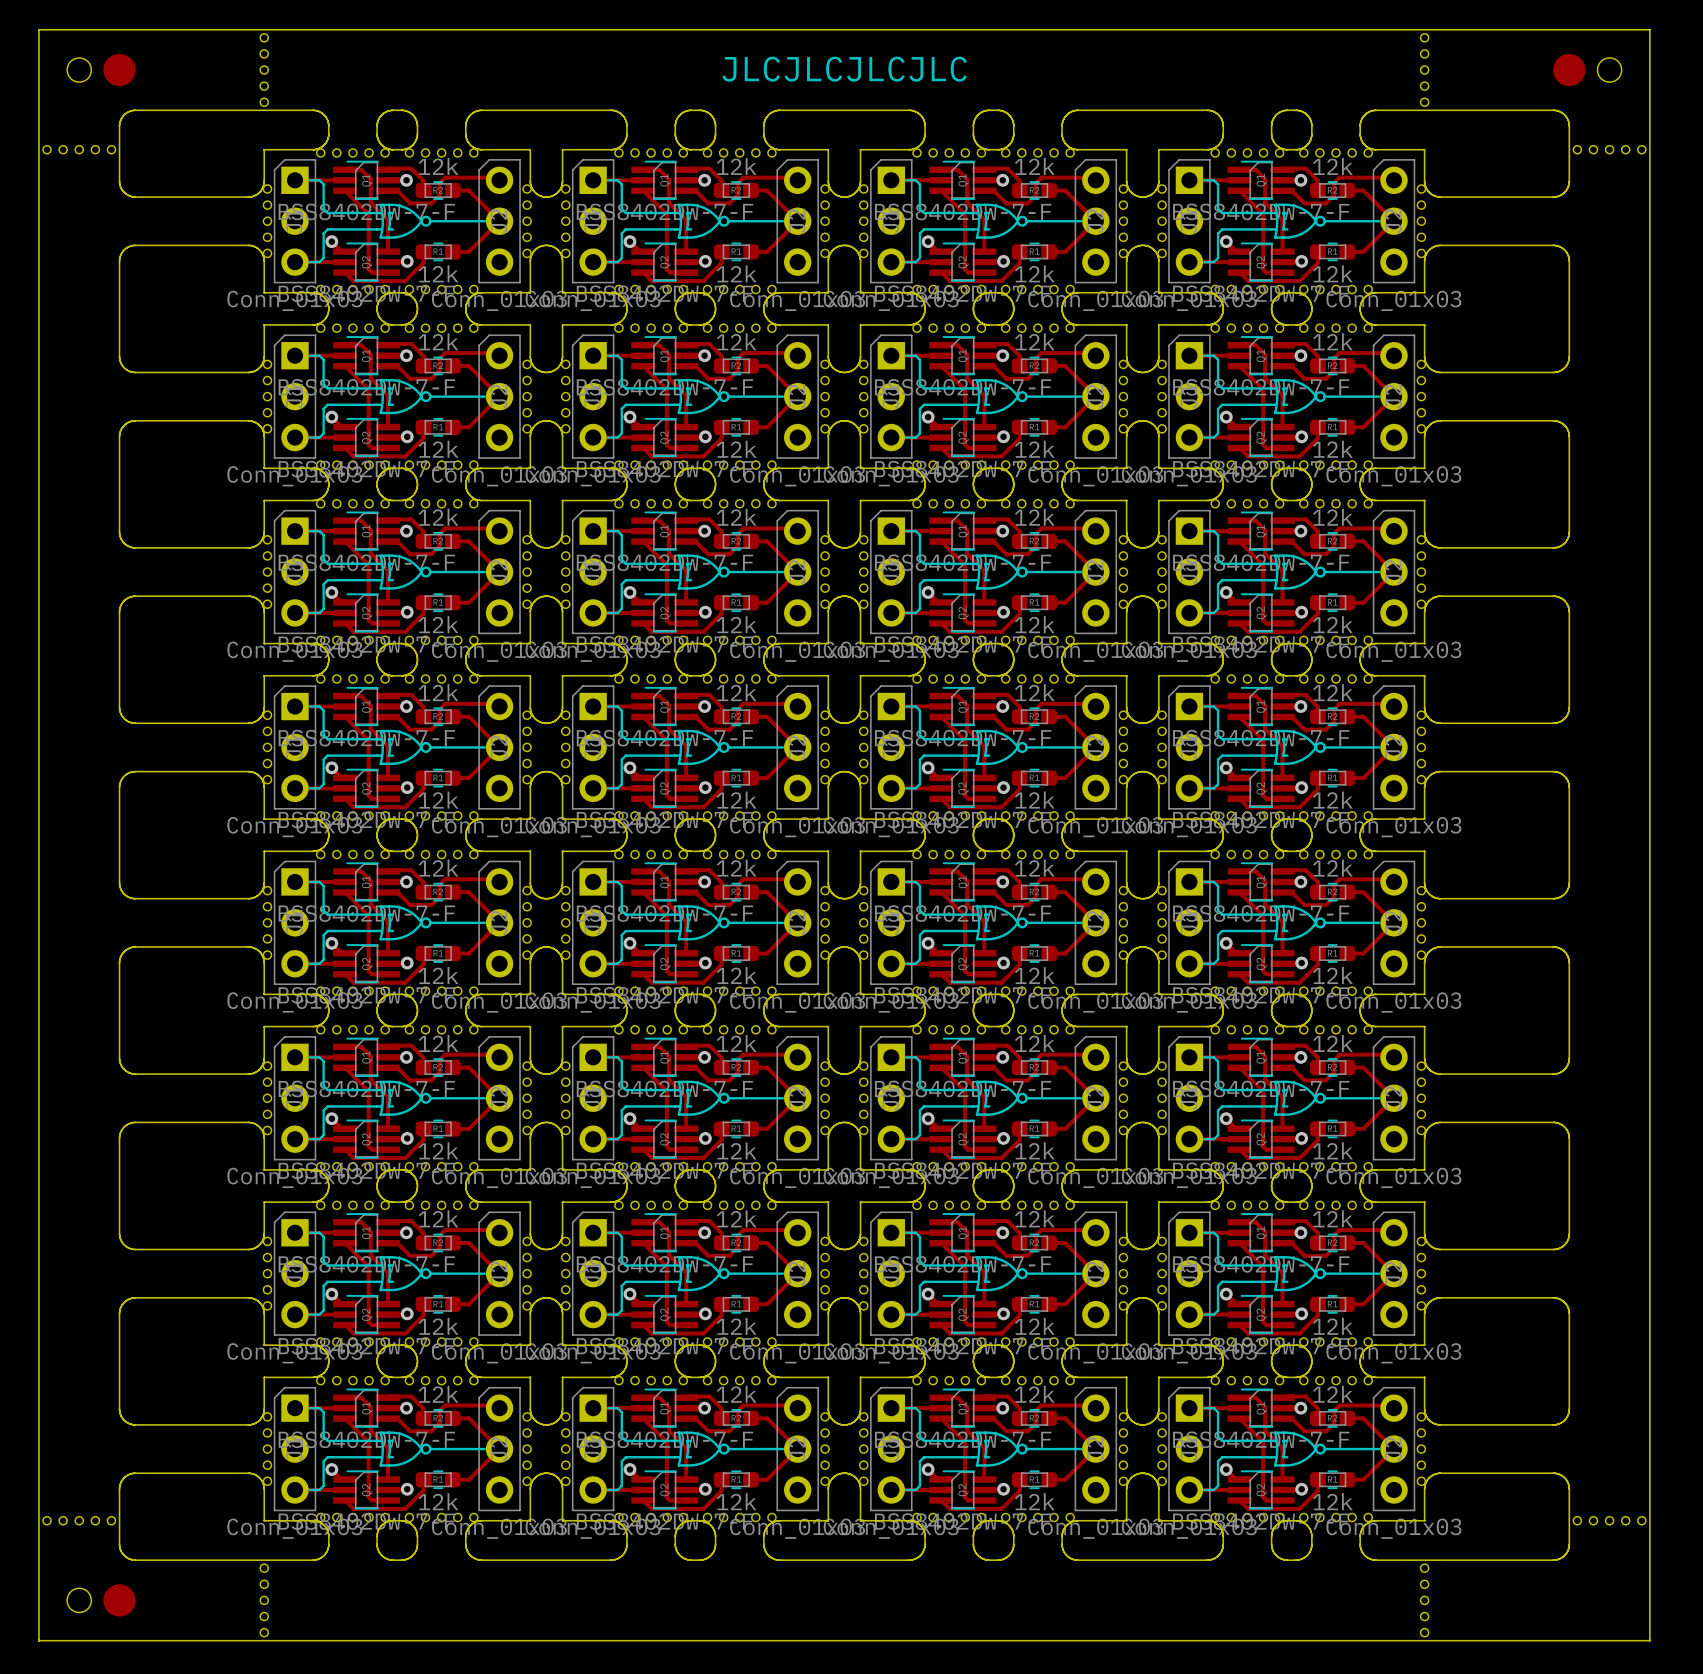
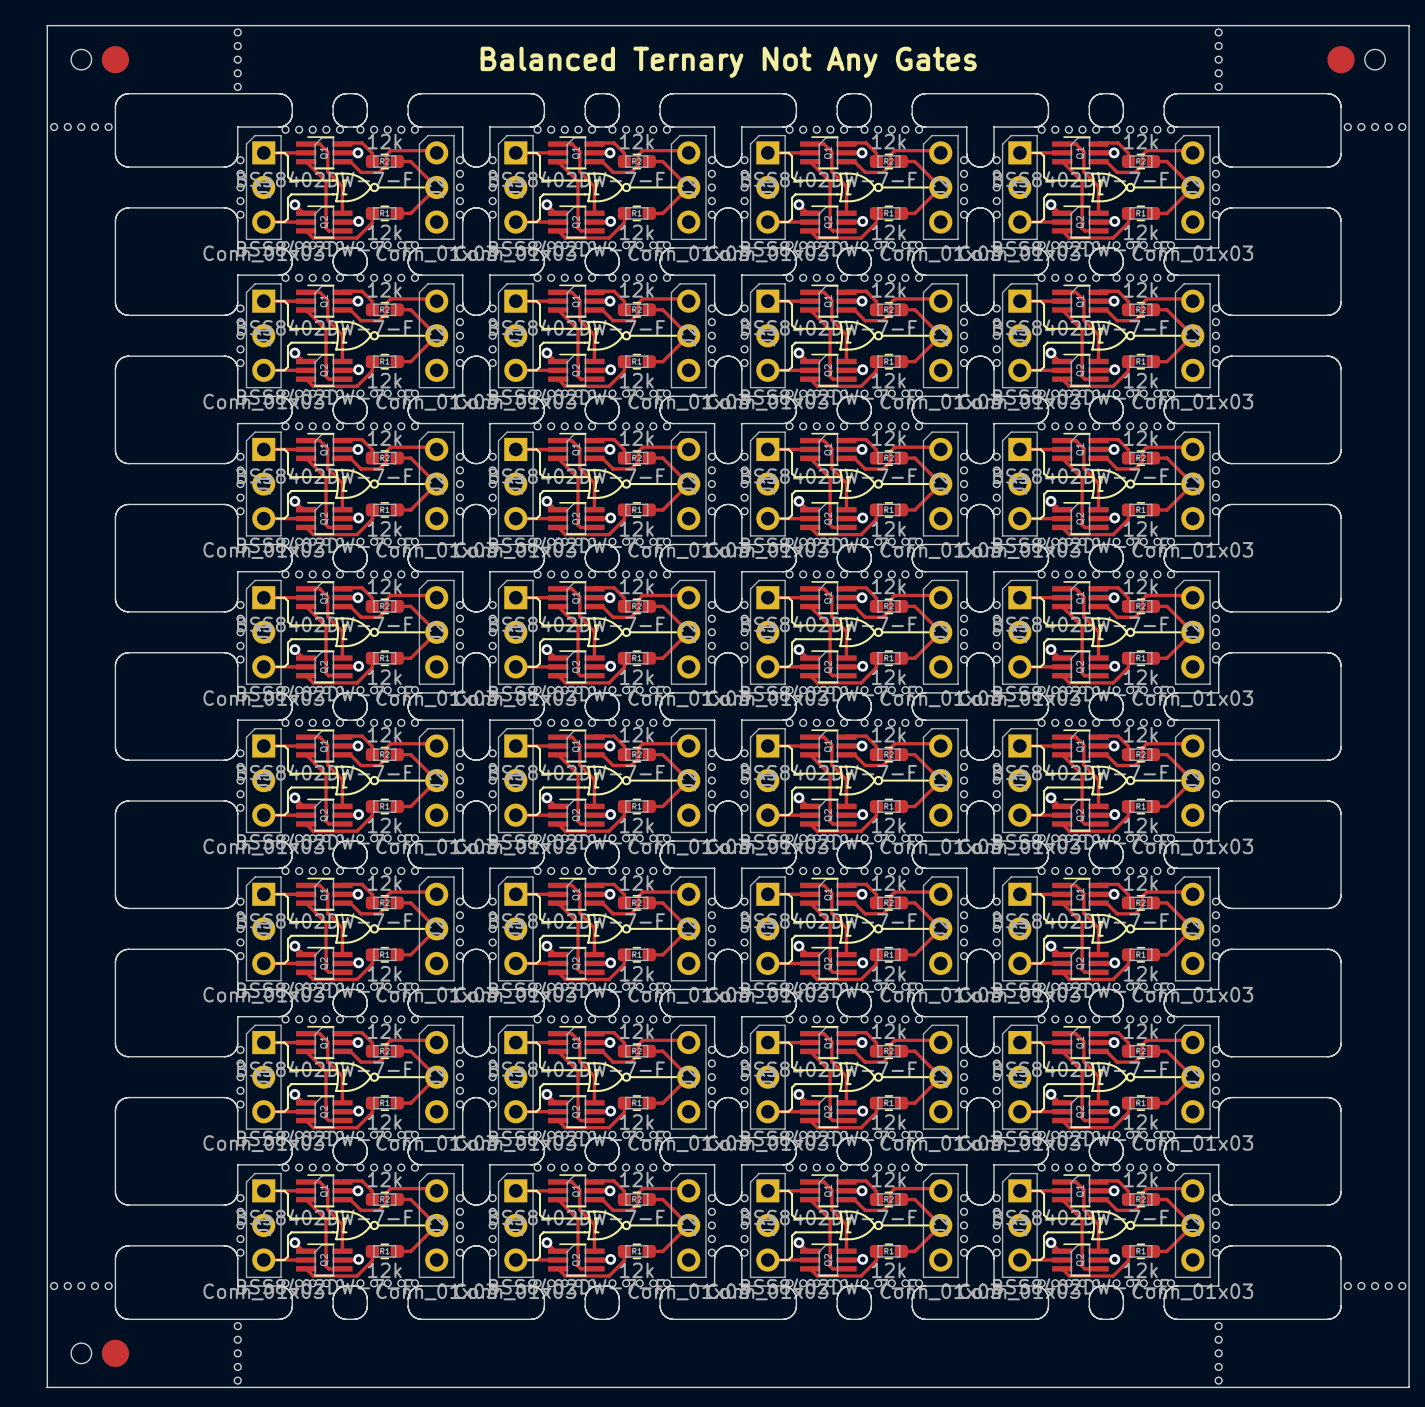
text: JLCJLCJLCJLC (844, 69) -> Balanced Ternary Not Any Gates (728, 62)

